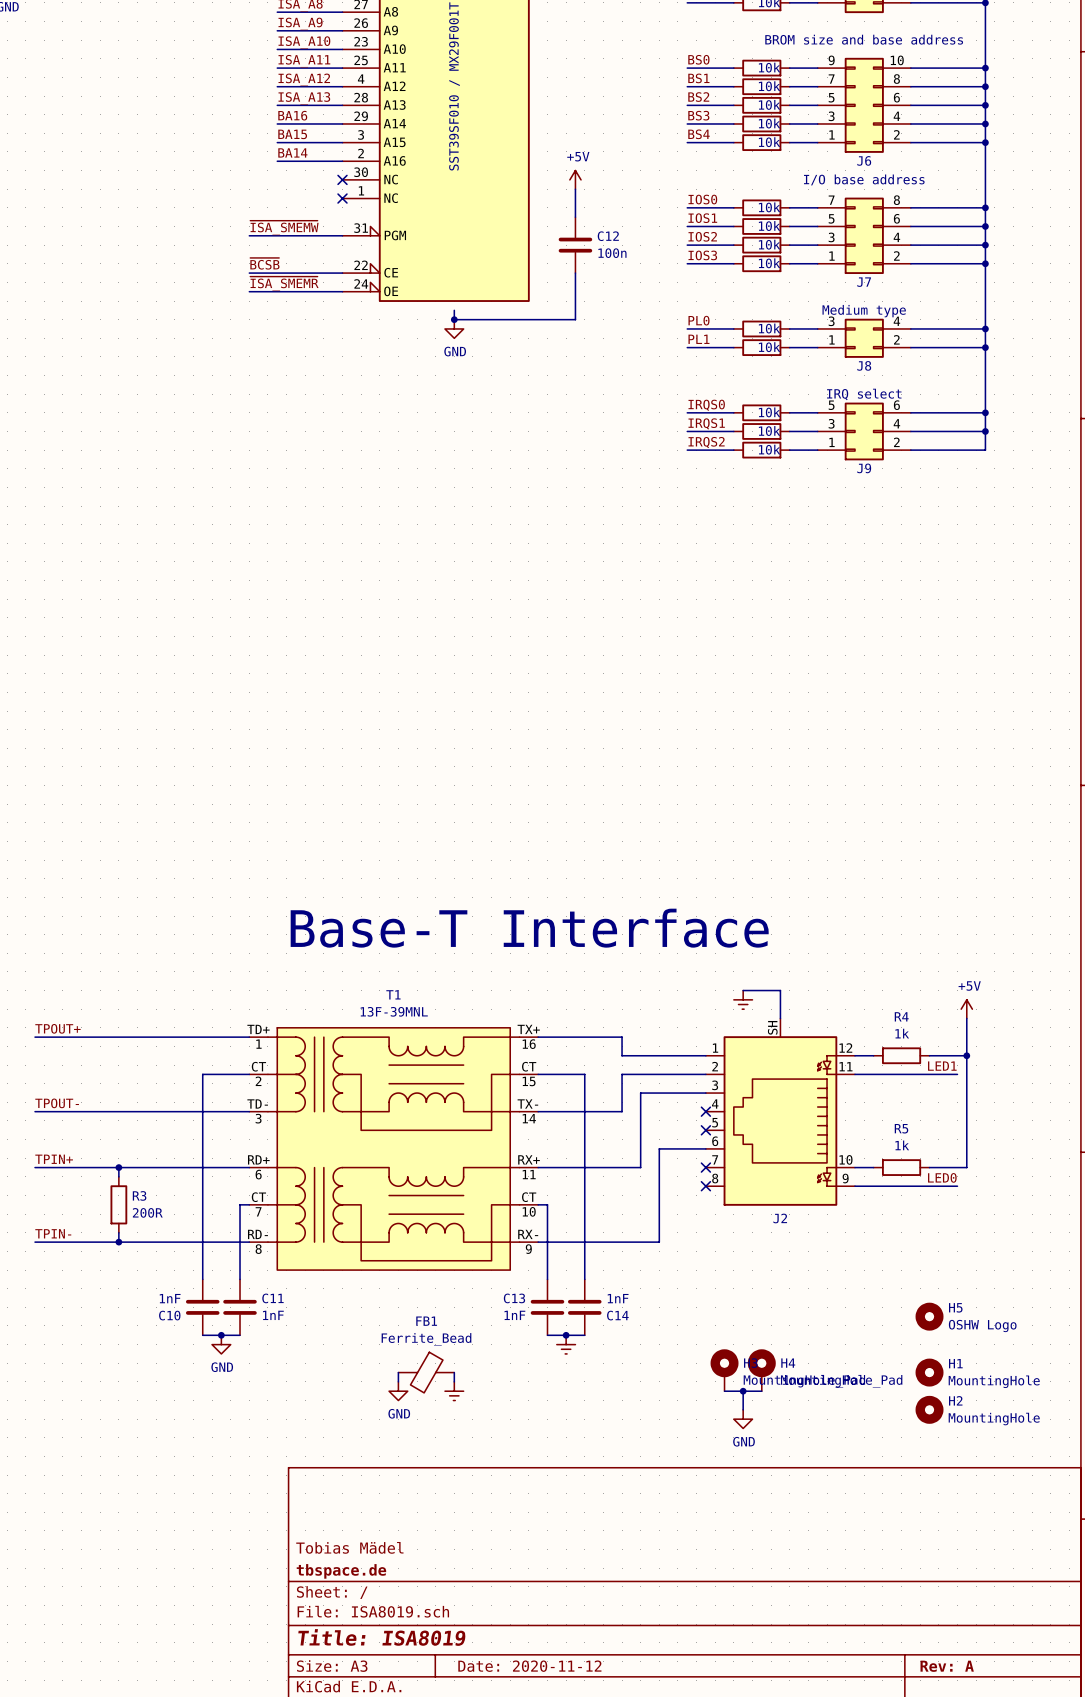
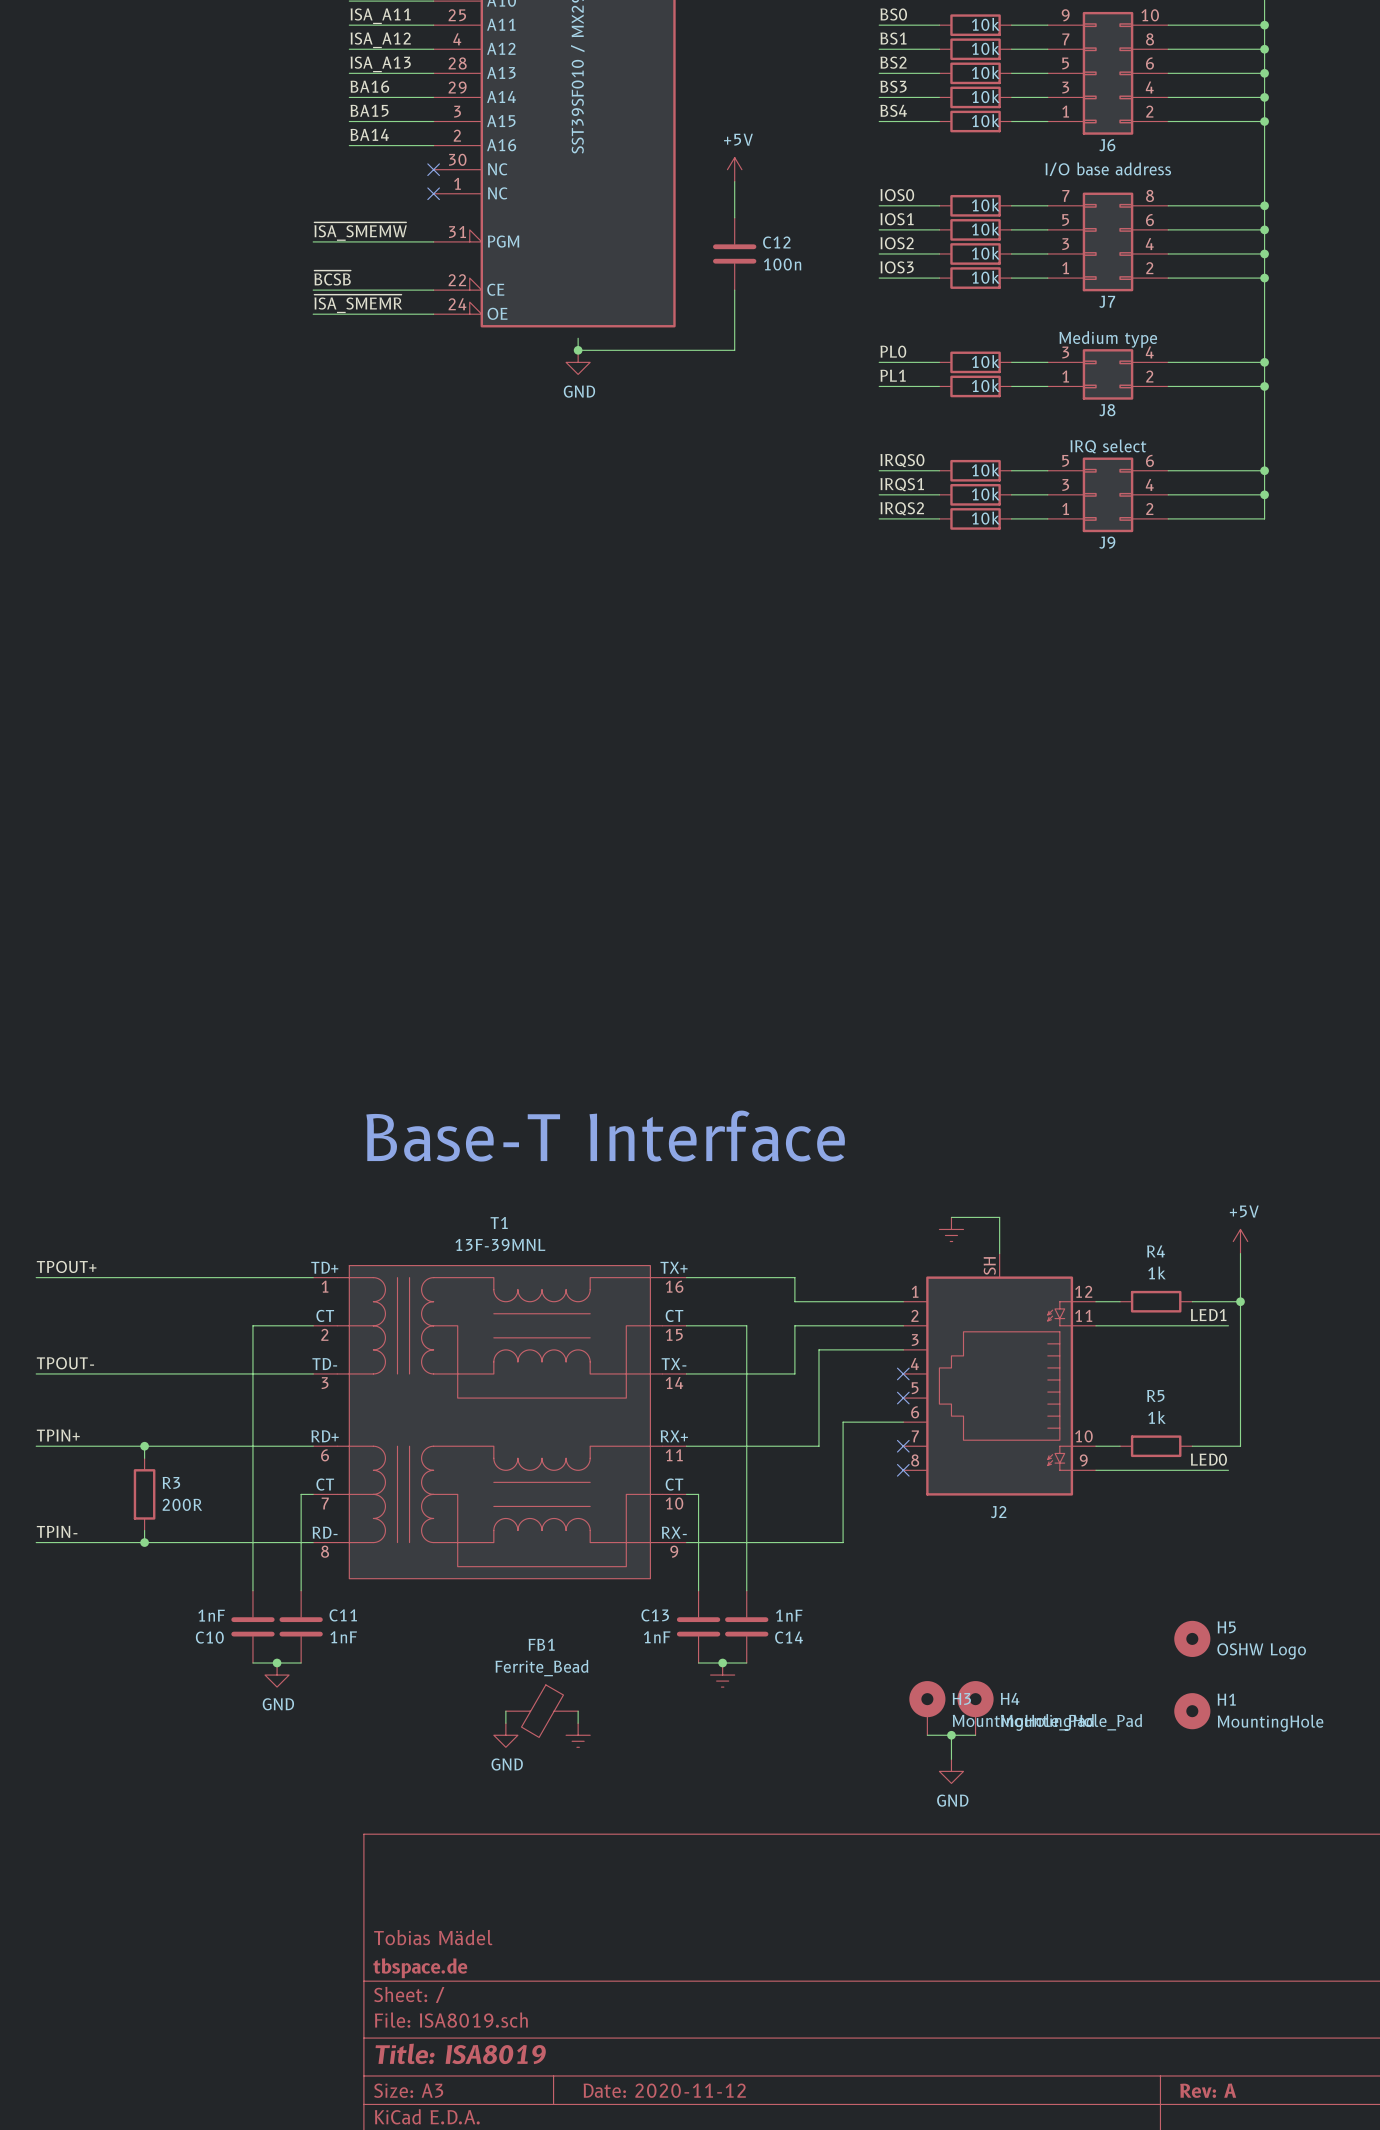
H2: MountingHole (929, 1409) -> none

